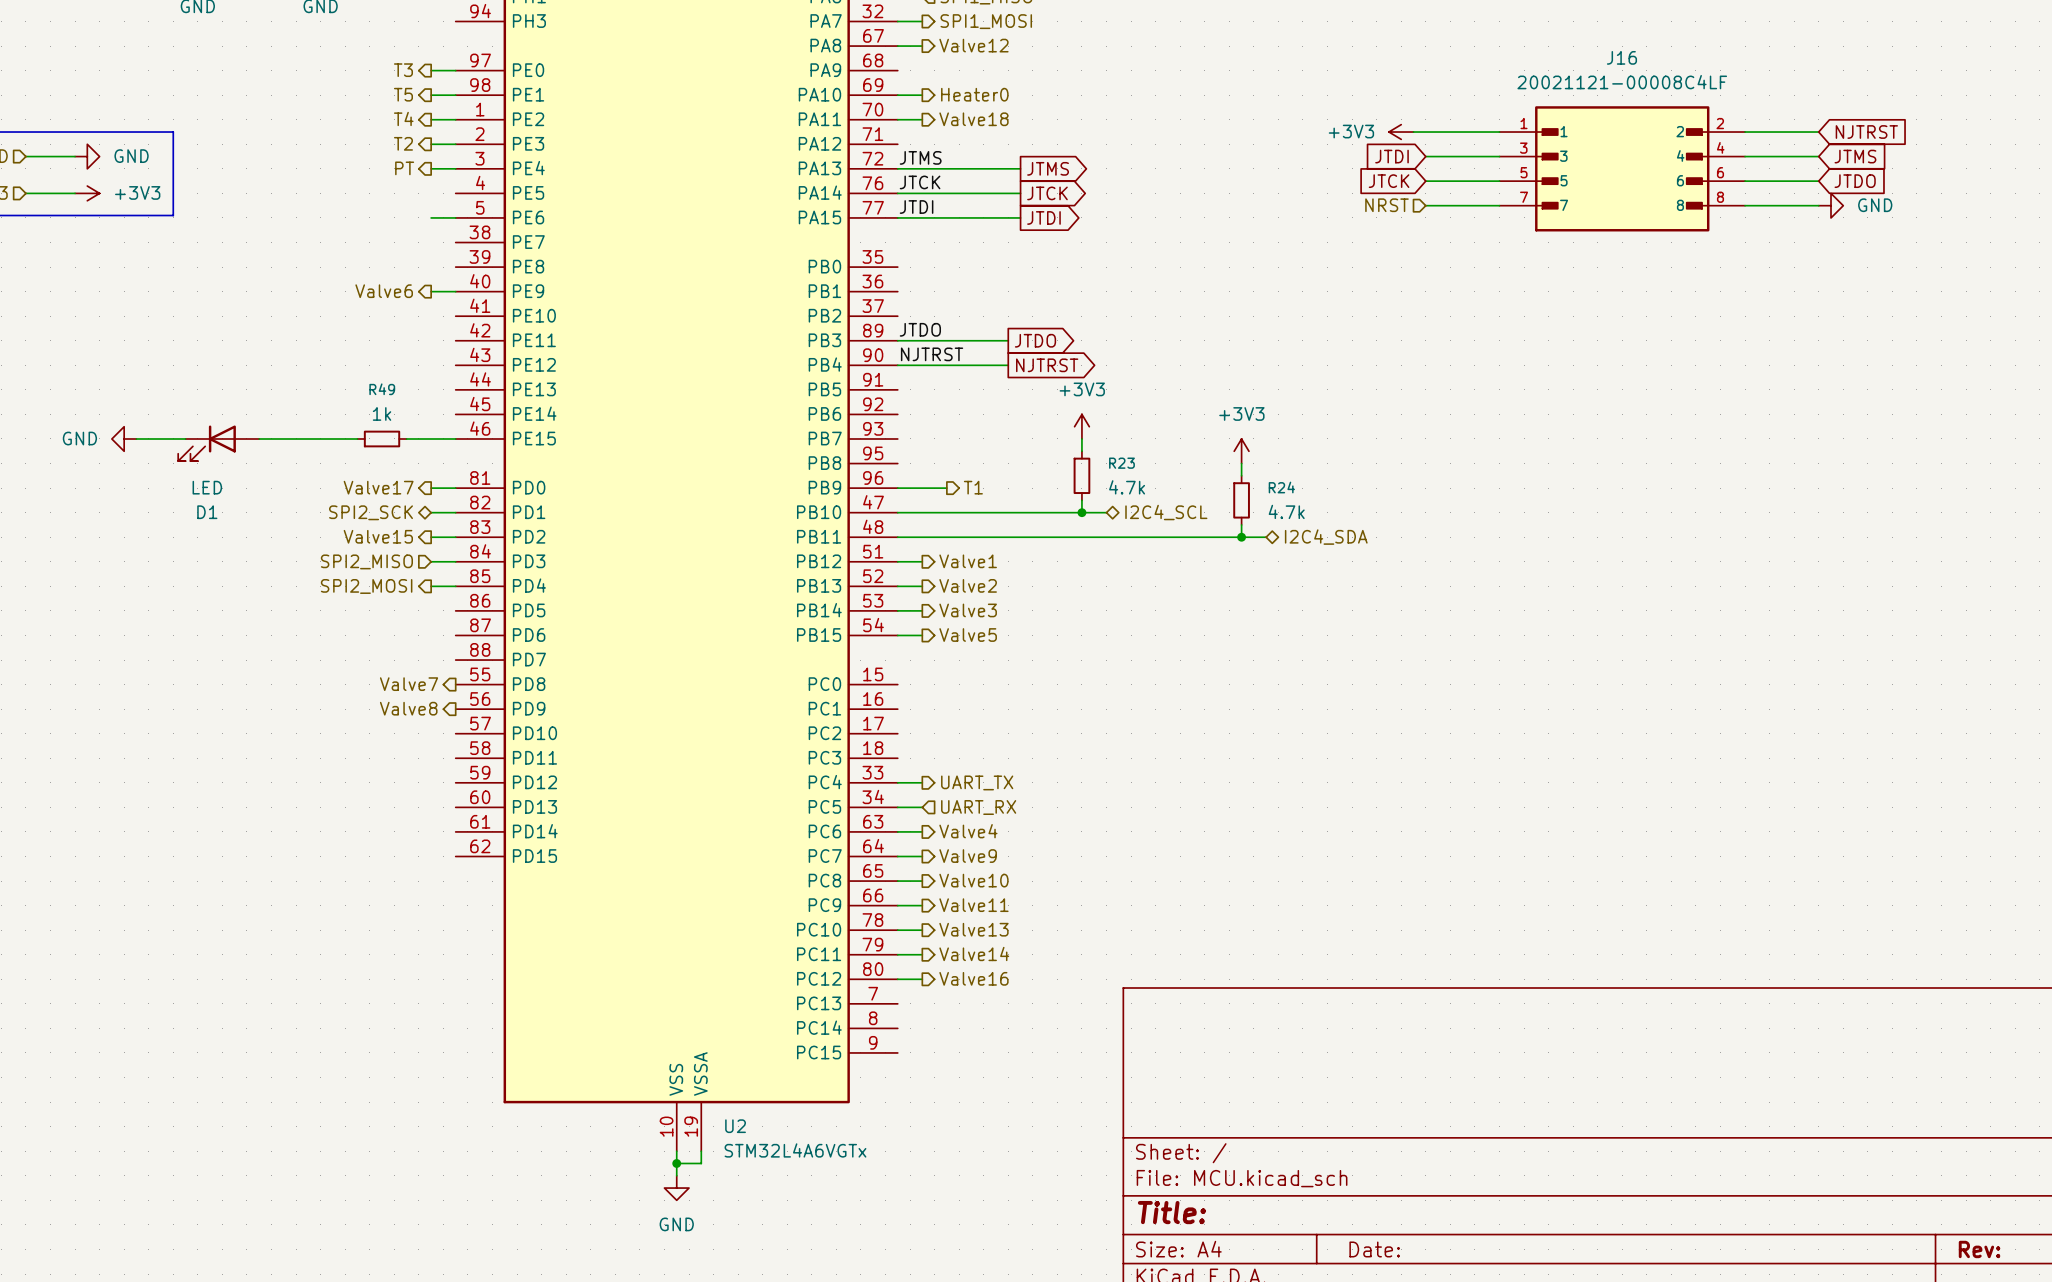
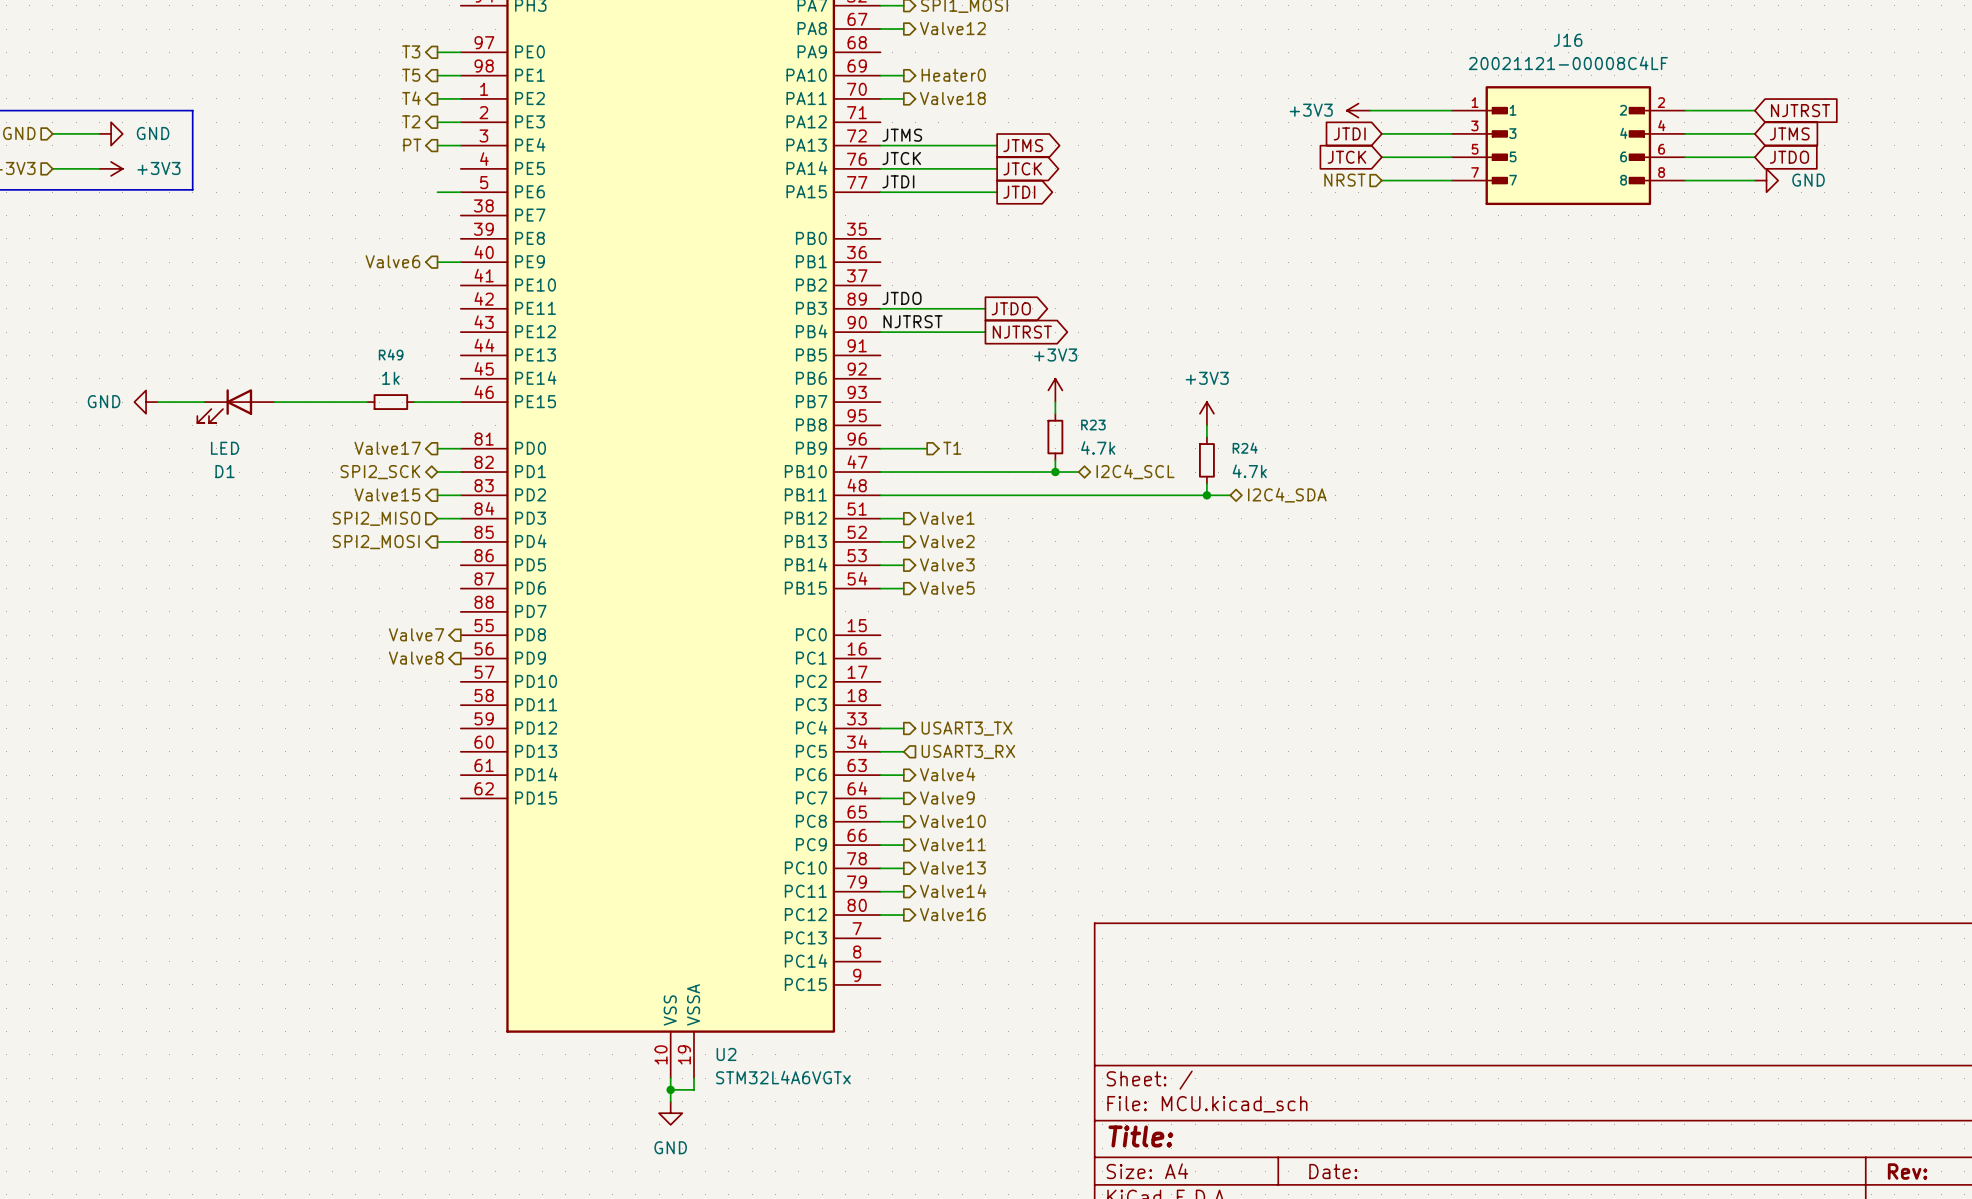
hierarchical label: UART_TX (977, 782) -> USART3_TX (967, 728)
hierarchical label: UART_RX (978, 807) -> USART3_RX (968, 751)

